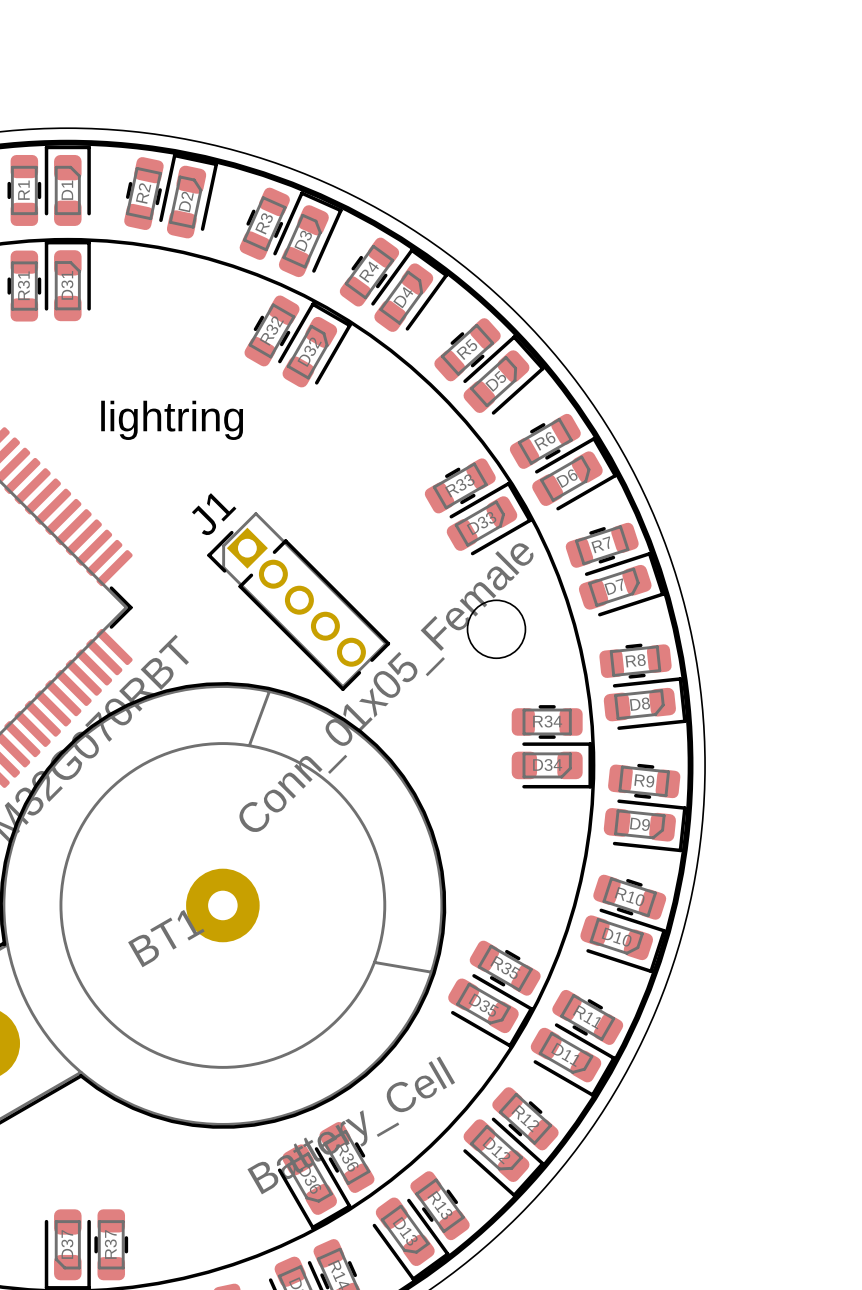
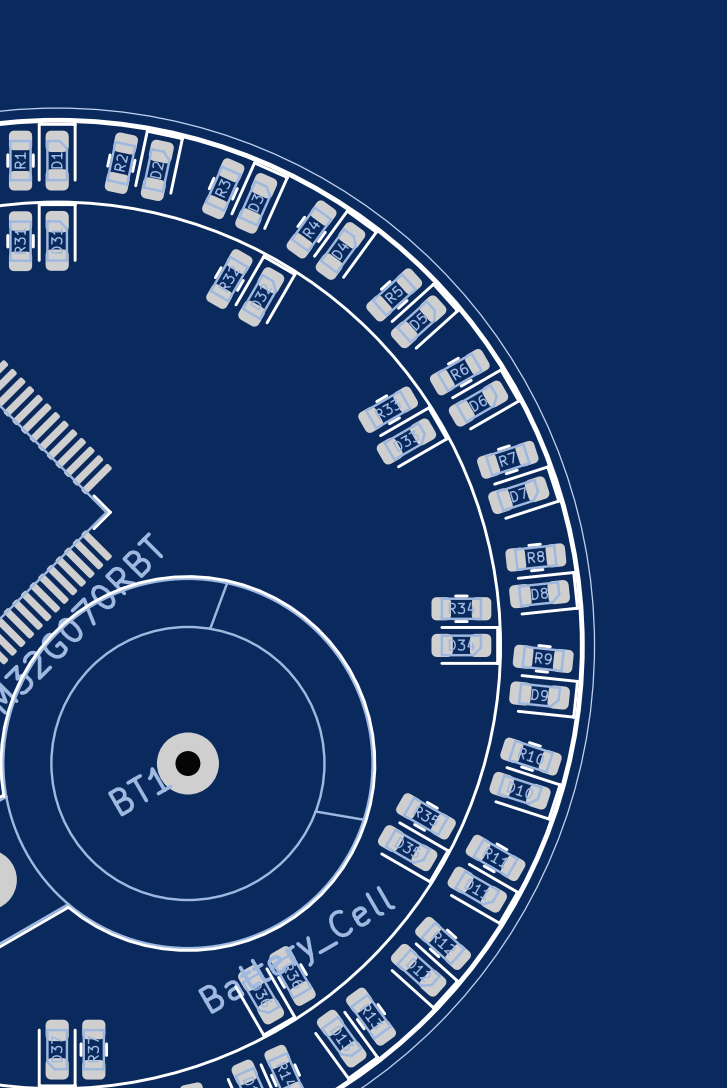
text: lightring (172, 420) -> none
round board edge: [466, 599, 527, 659] -> none
J1: Conn_01x05_Female (298, 601) -> none

